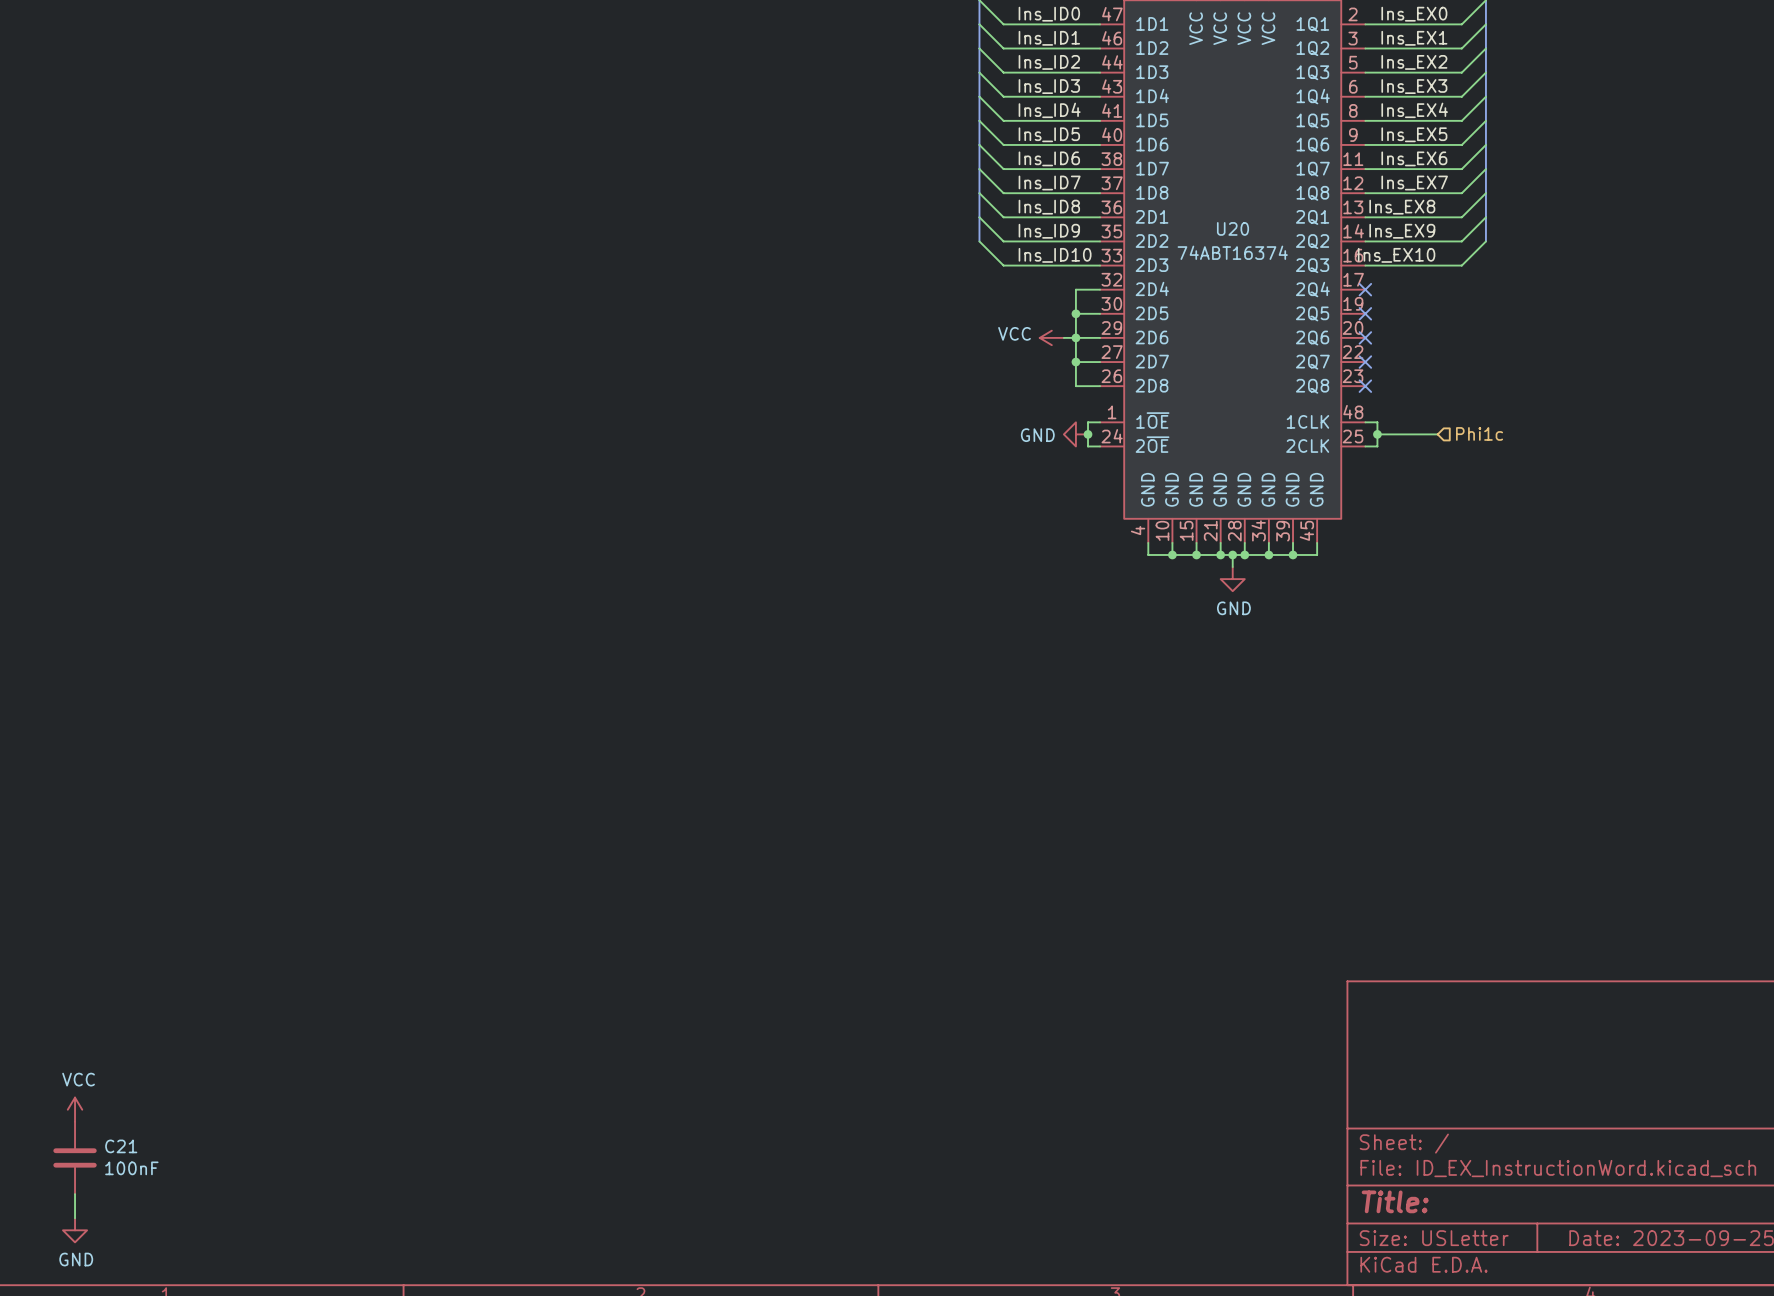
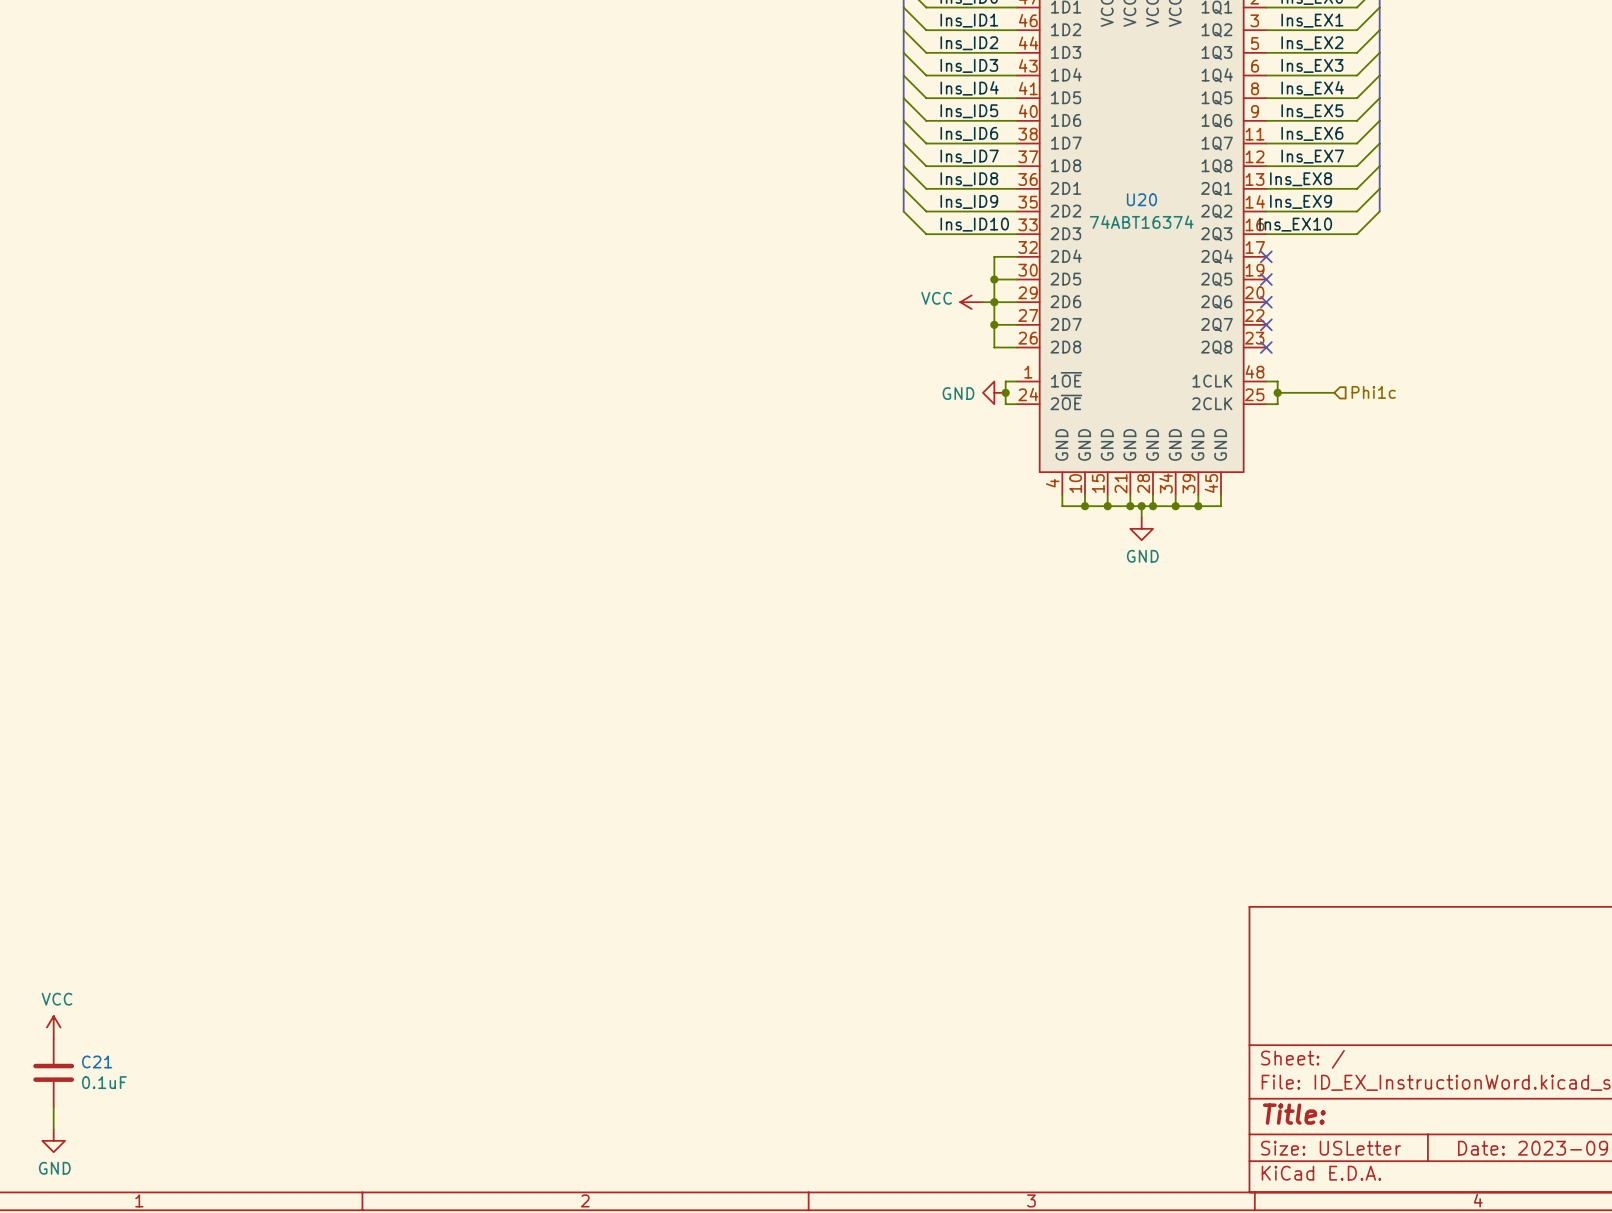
C21 value: 100nF (131, 1168) -> 0.1uF (104, 1082)

